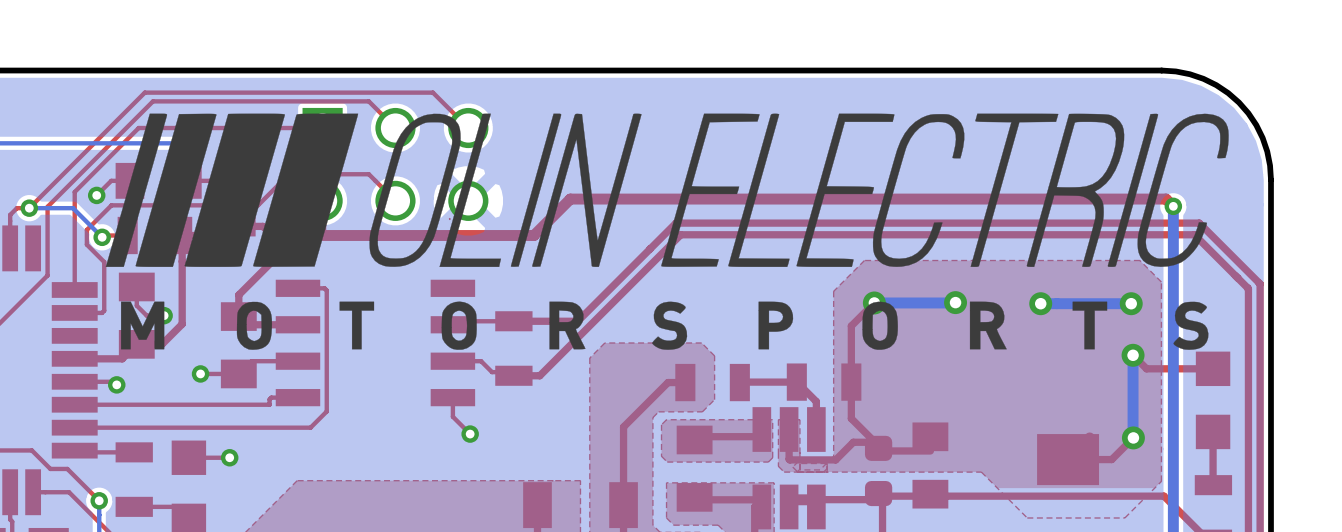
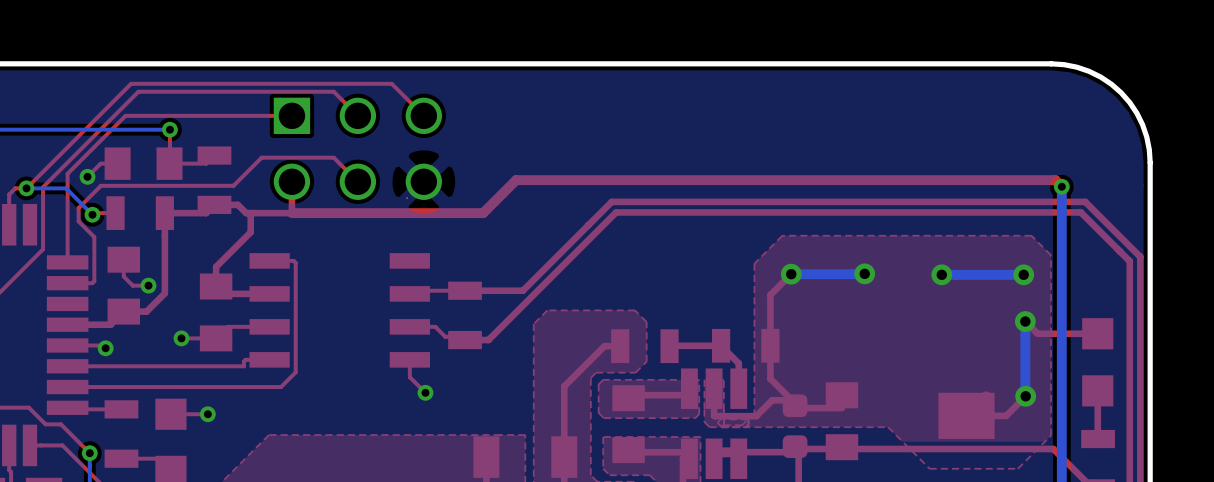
drawing: [105, 113, 1229, 350] -> none

